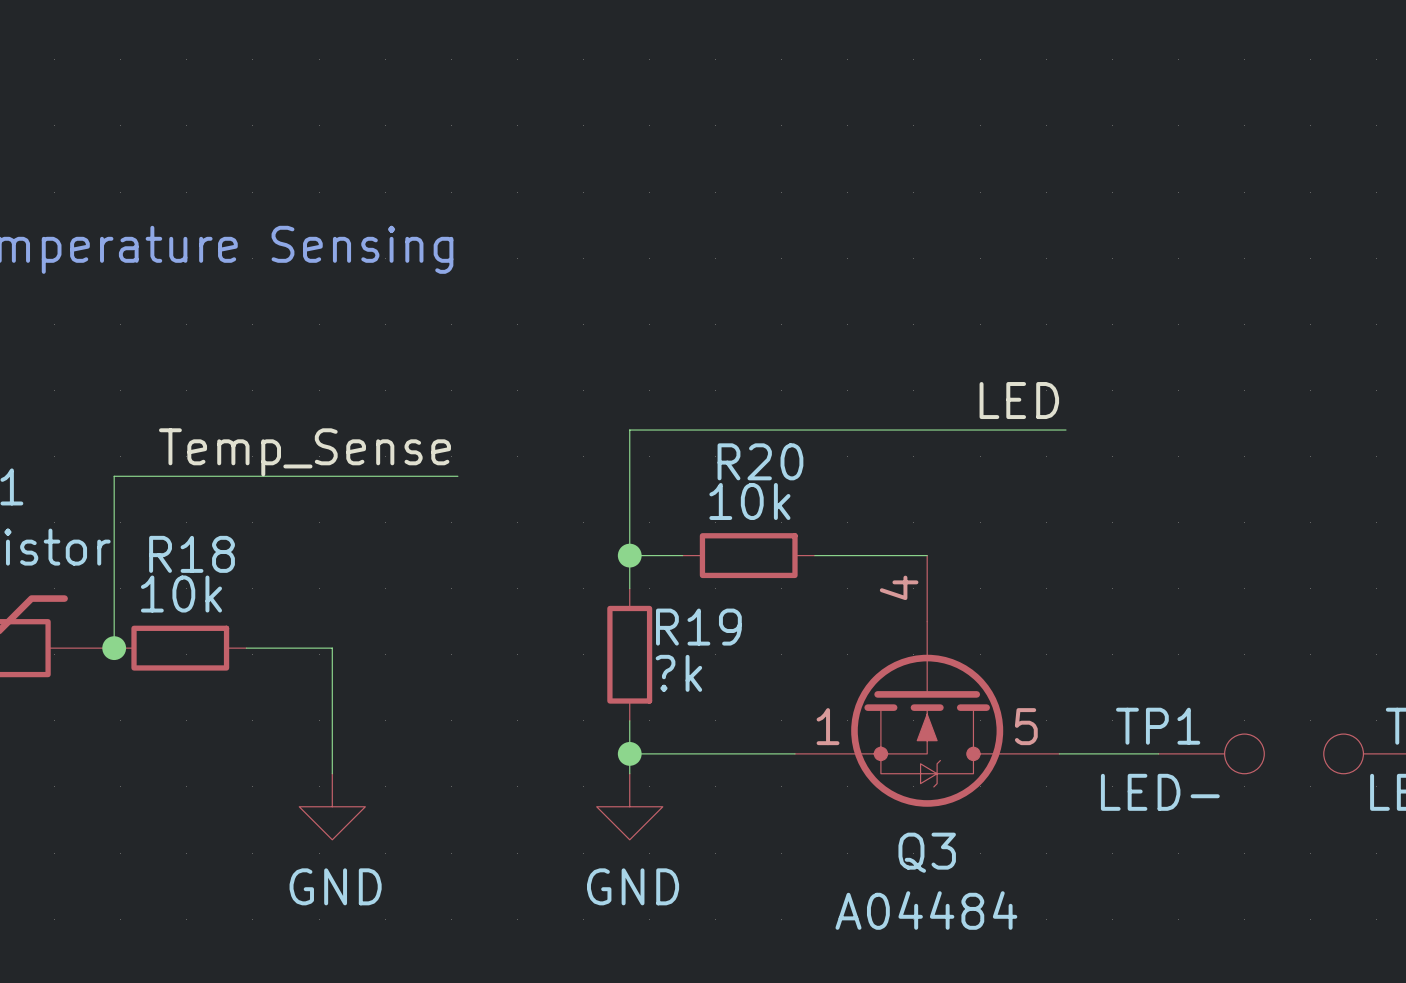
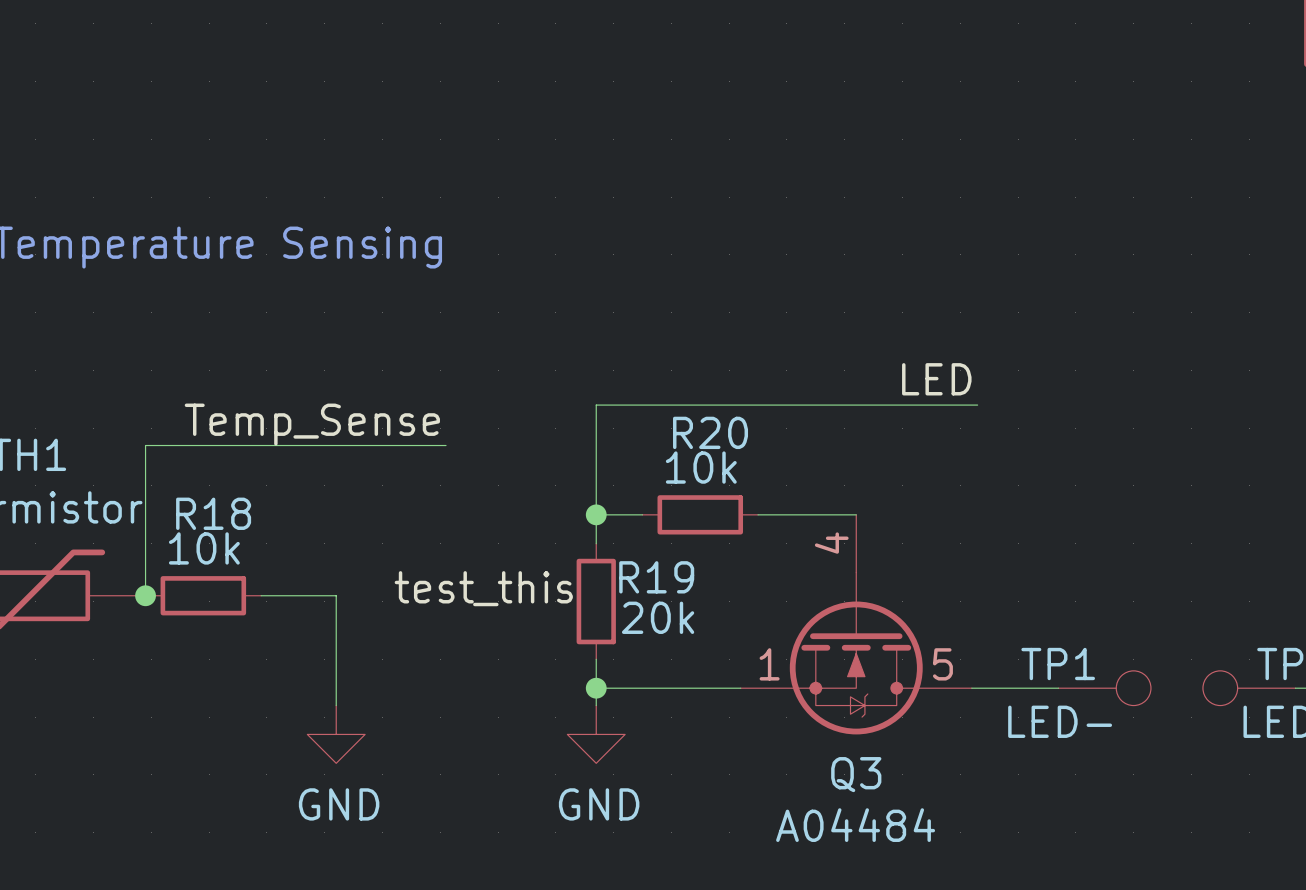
label: none -> test_this (483, 588)
R19 value: ?k (678, 673) -> 20k (658, 617)

